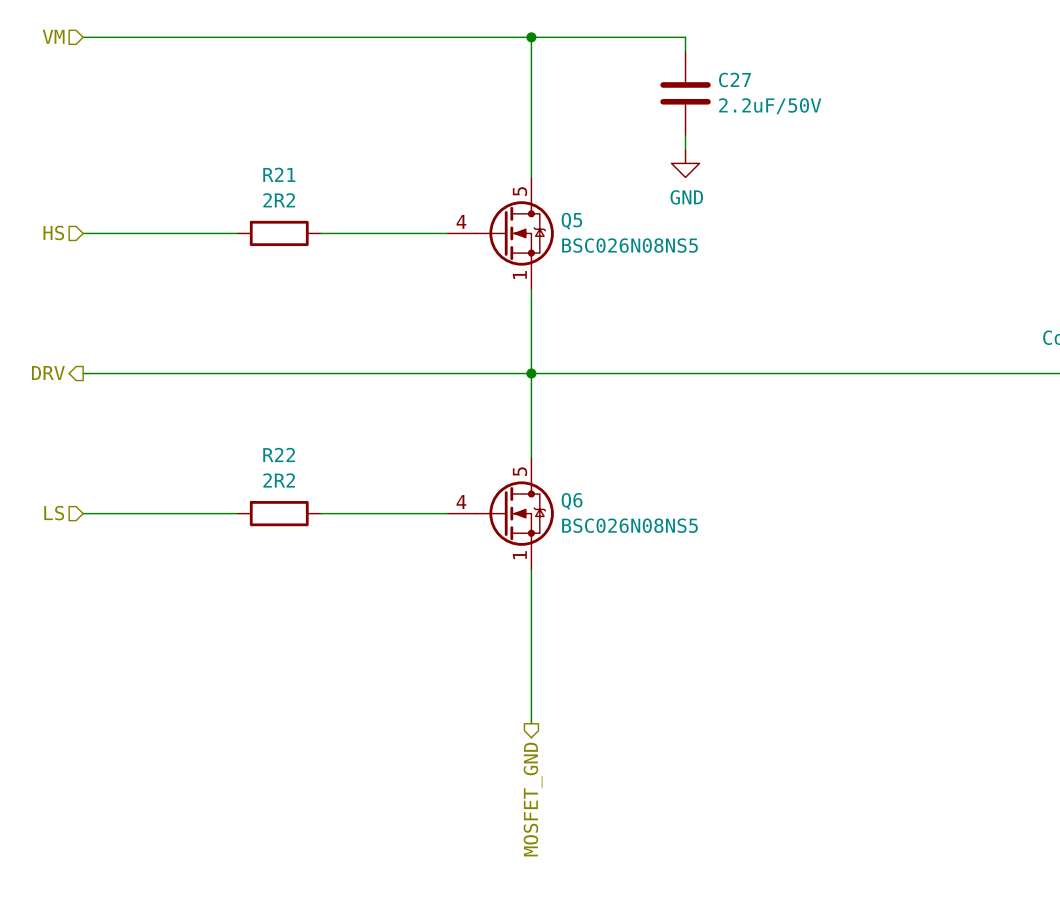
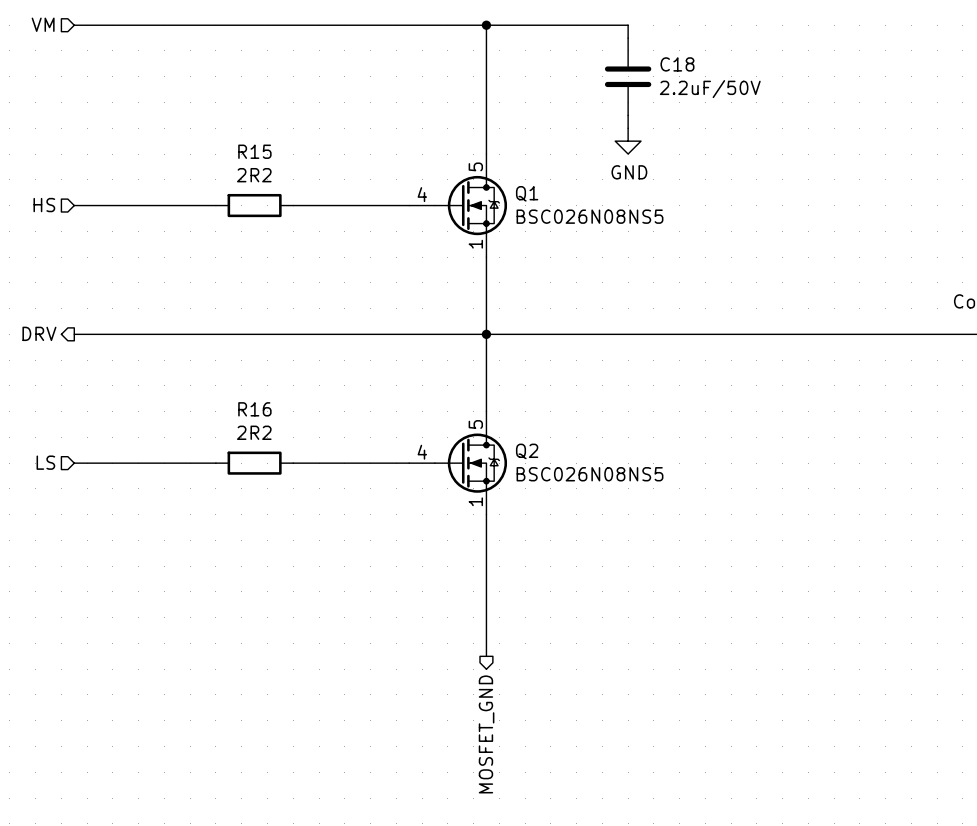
C27 name: C27 (735, 79) -> C18 (677, 64)
R21 name: R21 (279, 174) -> R15 (254, 151)
Q5 name: Q5 (571, 221) -> Q1 (527, 193)
R22 name: R22 (279, 454) -> R16 (254, 409)
Q6 name: Q6 (572, 501) -> Q2 (527, 451)

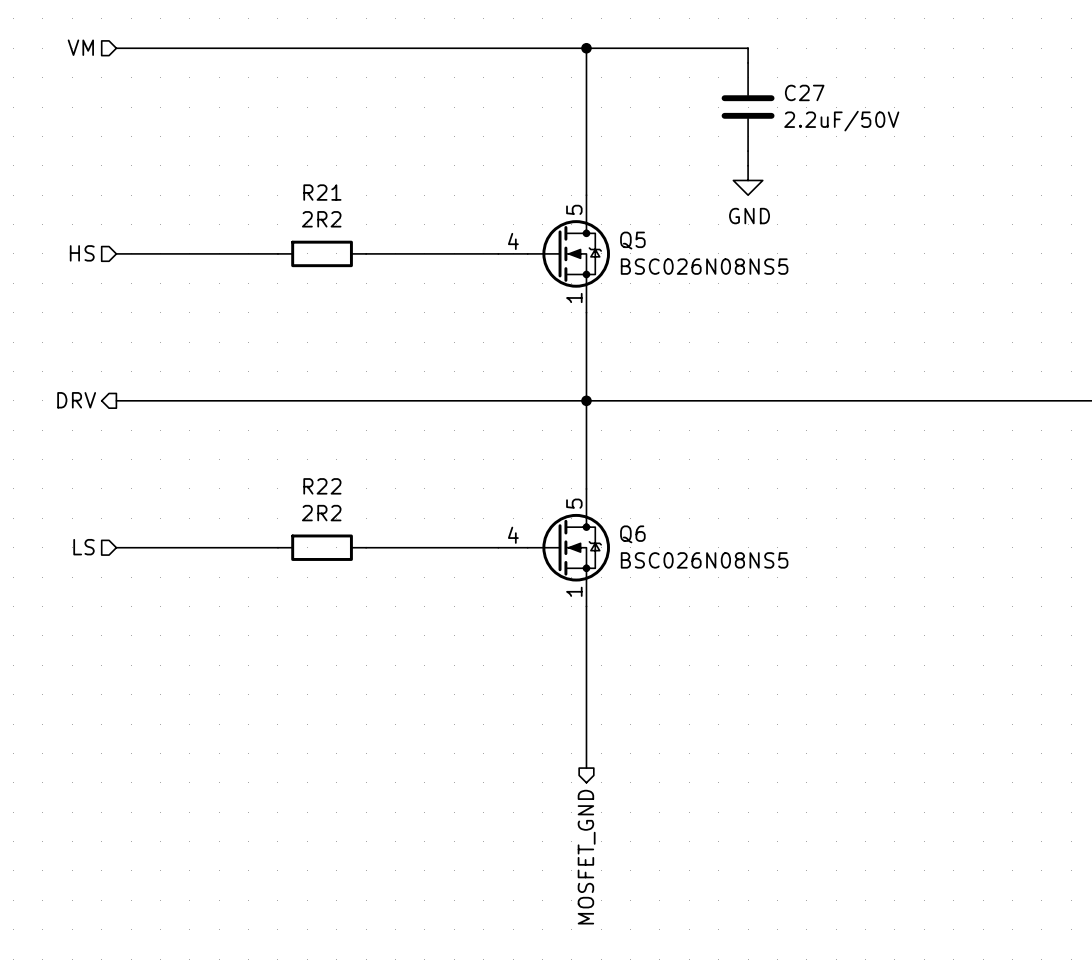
C18 name: C18 (677, 64) -> C27 (804, 92)
R15 name: R15 (254, 151) -> R21 (322, 192)
Q1 name: Q1 (527, 193) -> Q5 (632, 240)
R16 name: R16 (254, 409) -> R22 (322, 486)
Q2 name: Q2 (527, 451) -> Q6 (632, 534)

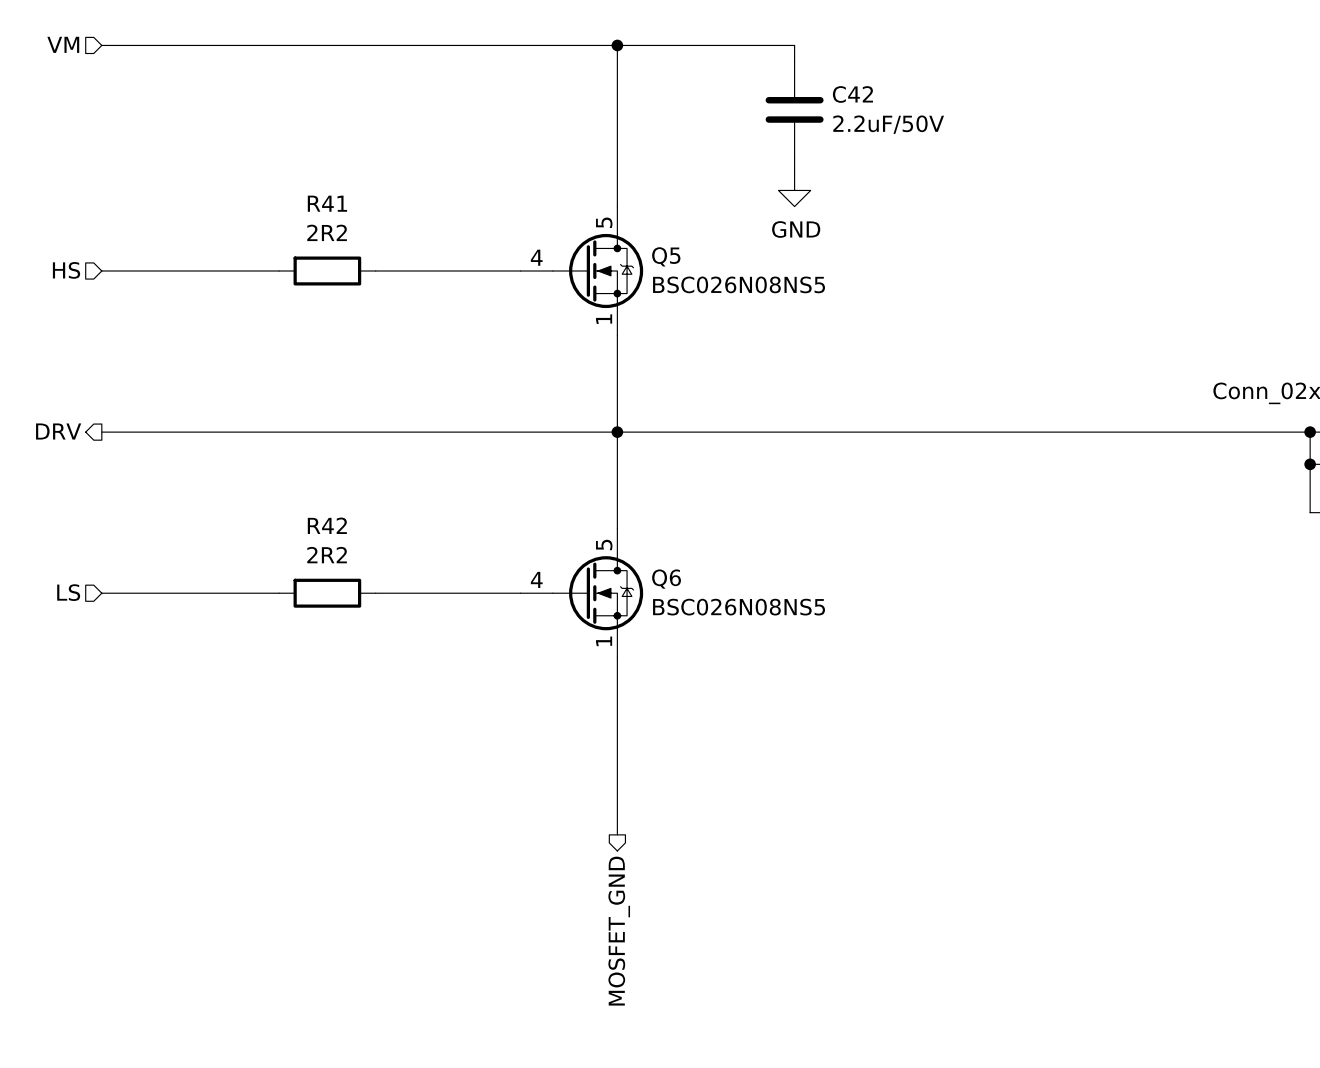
C27 name: C27 (804, 92) -> C42 (852, 94)
R21 name: R21 (322, 192) -> R41 (327, 203)
R22 name: R22 (322, 486) -> R42 (327, 525)

